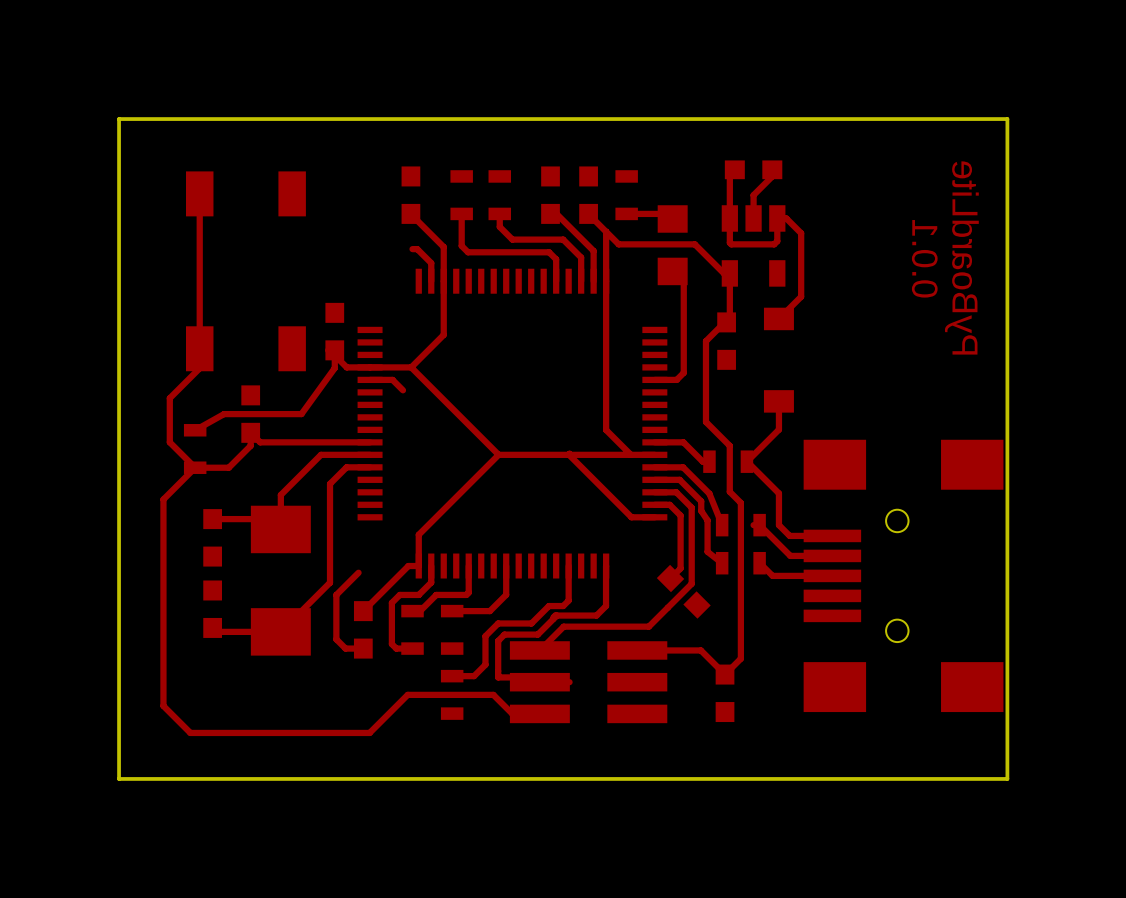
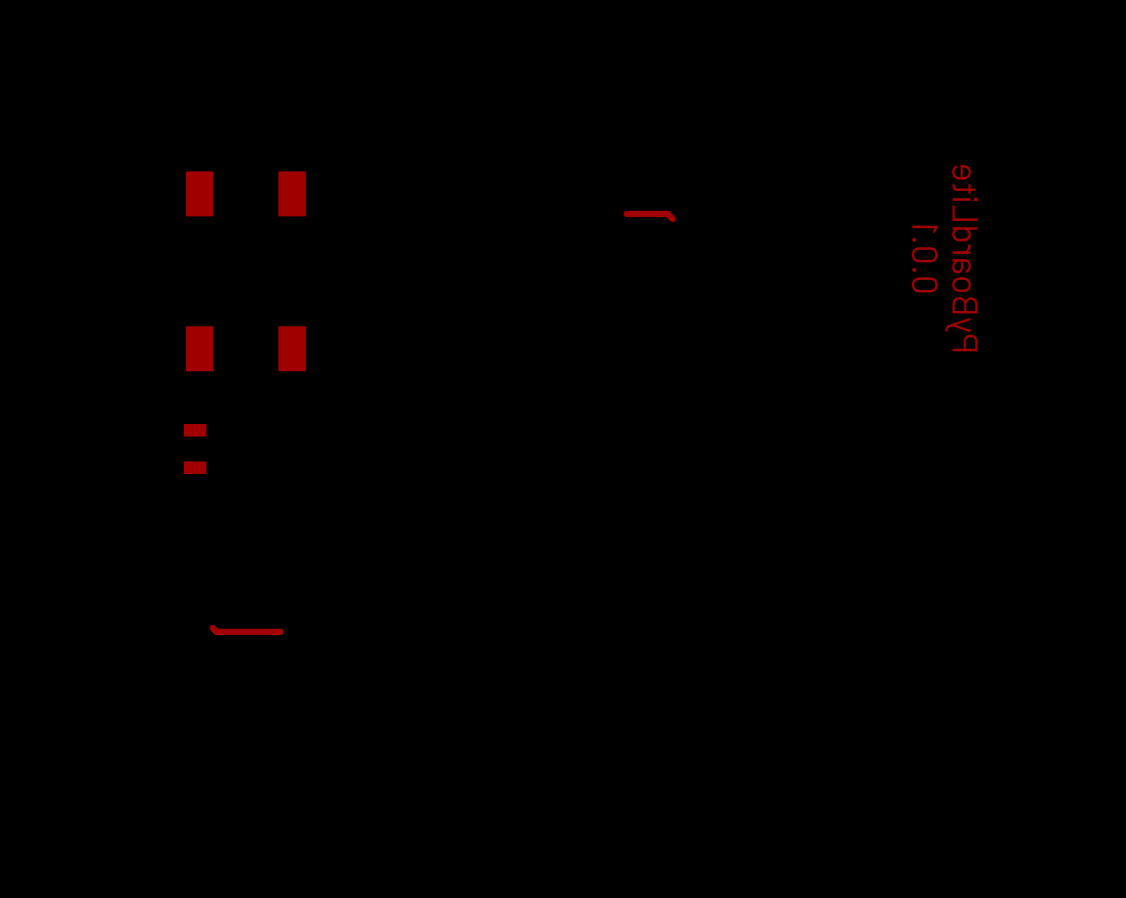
board edge: (1007, 119) (119, 119) (119, 778) (1007, 778) (1007, 119) -> none
top track: (734, 169) (729, 174) (731, 244) (774, 244) (777, 241) (777, 218) (786, 218) (801, 233) (801, 296) (778, 318) -> none
part: (753, 169) -> none
top track: (772, 169) (772, 176) (753, 195) (753, 218) -> none
top track: (199, 193) (199, 368) (169, 398) (169, 442) (195, 467) -> none
part: (410, 195) -> none
part: (461, 195) -> none
part: (499, 195) -> none
part: (550, 195) -> none
part: (588, 195) -> none
part: (626, 195) -> none
top track: (461, 213) (461, 245) (468, 252) (549, 252) (556, 259) (556, 281) -> none
top track: (499, 213) (499, 226) (512, 239) (563, 239) (581, 257) (581, 281) -> none
top track: (550, 213) (556, 213) (593, 250) (593, 281) -> none
top track: (410, 214) (443, 247) (443, 334) (411, 367) -> none
top track: (588, 214) (618, 244) (694, 244) (723, 273) (729, 273) (729, 319) (705, 341) (705, 422) (729, 445) (729, 491) (740, 502) (740, 658) (725, 674) (700, 650) (637, 650) -> none
top track: (606, 231) (606, 430) (630, 454) -> none
part: (672, 245) -> none
part: (753, 245) -> none
top track: (412, 249) (417, 249) (431, 263) (431, 281) -> none
top track: (672, 271) (683, 282) (683, 372) (676, 379) (654, 379) -> none
part: (334, 331) -> none
part: (726, 341) -> none
top track: (328, 350) (334, 350) (334, 368) (301, 414) (224, 414) (195, 430) -> none
top track: (334, 355) (346, 367) (411, 367) -> none
part: (778, 360) -> none
top track: (411, 367) (498, 454) -> none
top track: (370, 379) (392, 379) (402, 390) -> none
top track: (778, 401) (778, 429) (746, 461) -> none
part: (250, 414) -> none
part: (512, 423) -> none
top track: (370, 442) (260, 442) (250, 432) (250, 445) (228, 467) (195, 467) -> none
top track: (654, 442) (683, 442) (702, 461) (709, 461) -> none
top track: (370, 454) (321, 454) (280, 495) (280, 529) (262, 511) -> none
top track: (498, 454) (418, 534) (418, 566) (408, 566) (363, 611) -> none
top track: (569, 454) (631, 517) (654, 517) -> none
top track: (654, 454) (498, 454) -> none
part: (728, 461) -> none
top track: (747, 461) (778, 493) (778, 525) (789, 535) (832, 535) -> none
top track: (195, 467) (163, 499) (163, 705) (190, 732) (369, 732) (407, 694) (493, 694) (512, 713) (539, 713) -> none
top track: (370, 467) (346, 467) (330, 483) (330, 582) (275, 637) -> none
top track: (654, 467) (683, 467) (709, 493) (722, 525) -> none
top track: (654, 479) (679, 479) (701, 501) (701, 510) (707, 520) (707, 551) (722, 563) -> none
top track: (654, 492) (676, 492) (691, 507) (691, 583) (648, 626) (563, 626) (539, 650) -> none
top track: (654, 504) (669, 504) (680, 515) (680, 568) (670, 578) -> none
top track: (270, 519) (212, 519) -> none
part: (740, 525) -> none
top track: (753, 525) (759, 525) (790, 555) (832, 555) -> none
part: (212, 537) -> none
part: (740, 563) -> none
top track: (759, 563) (772, 575) (832, 575) -> none
top track: (431, 566) (431, 582) (418, 594) (399, 594) (391, 602) (391, 644) (396, 648) (412, 648) -> none
top track: (468, 566) (468, 592) (466, 594) (436, 594) (420, 611) (412, 611) -> none
top track: (506, 566) (506, 594) (489, 611) (452, 611) -> none
top track: (568, 566) (568, 600) (563, 606) (548, 606) (531, 623) (498, 623) (485, 636) (485, 664) (474, 676) (452, 676) -> none
top track: (606, 566) (606, 606) (596, 615) (555, 615) (537, 634) (504, 634) (498, 640) (498, 677) (535, 677) (539, 682) (569, 682) -> none
top track: (358, 572) (336, 594) (336, 639) (345, 648) (363, 648) -> none
part: (903, 575) -> none
part: (280, 580) -> none
part: (683, 591) -> none
part: (212, 609) -> none
part: (363, 629) -> none
part: (412, 629) -> none
part: (452, 629) -> none
part: (588, 682) -> none
part: (725, 693) -> none
part: (452, 694) -> none

